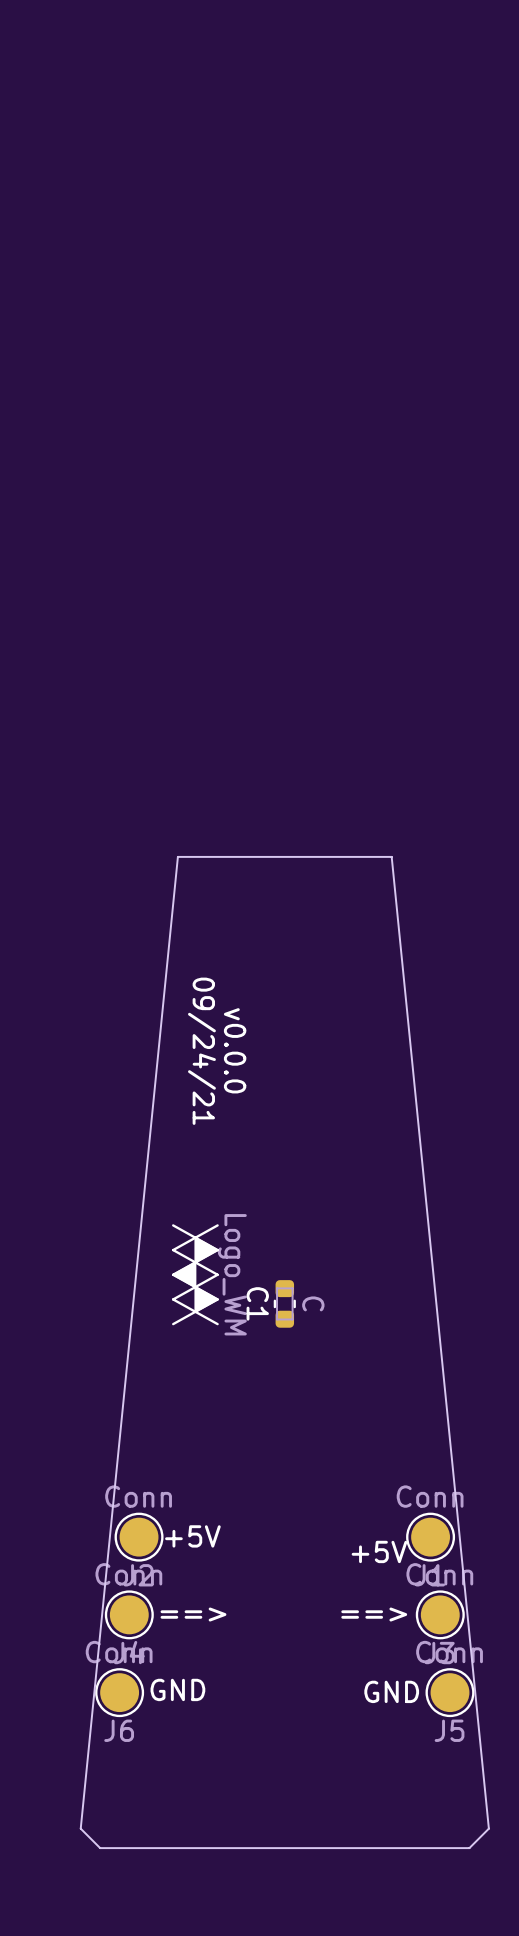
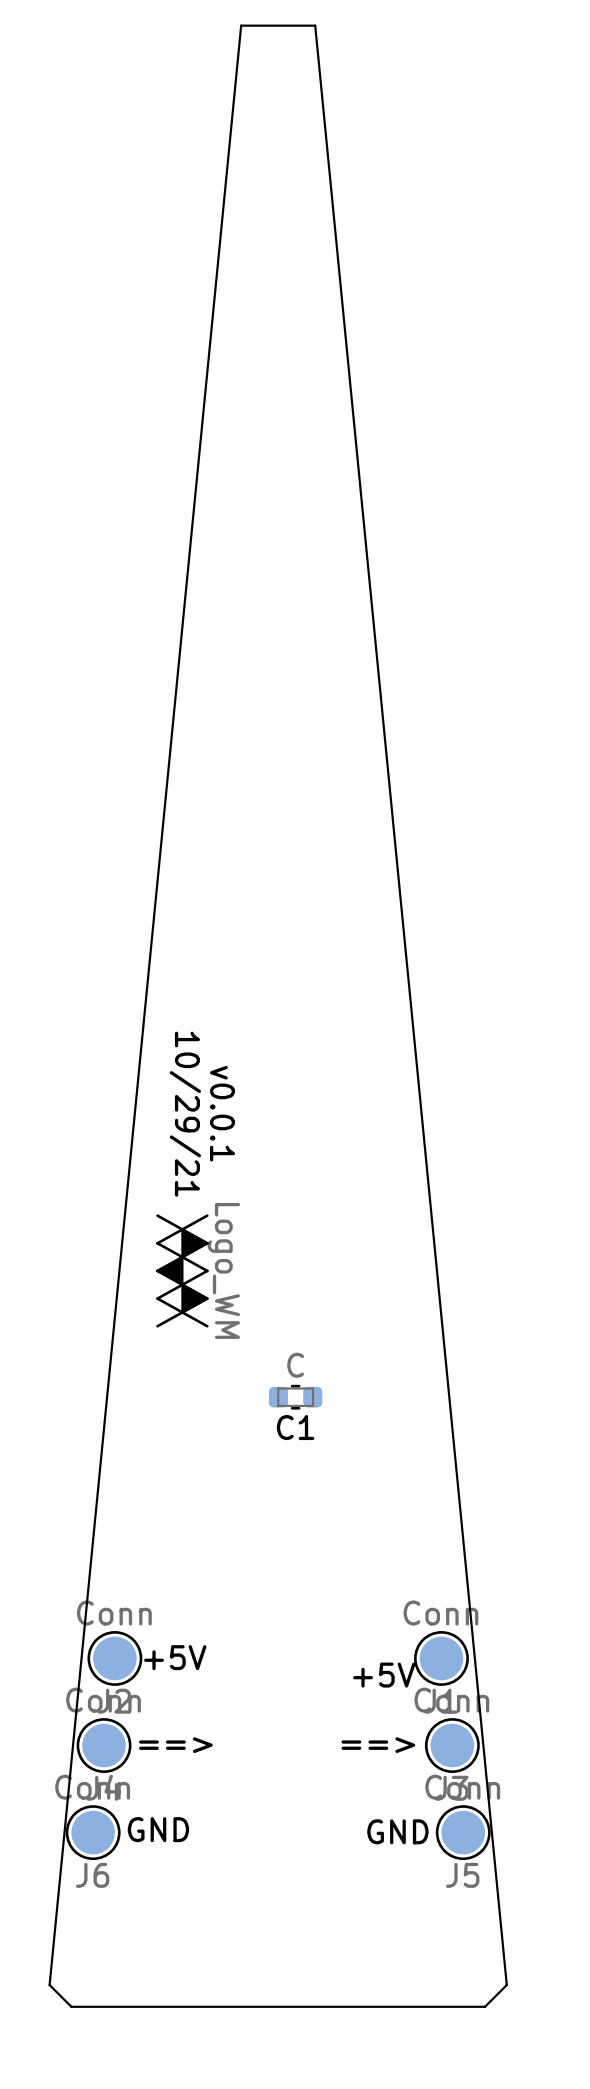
text: v0.0.0 (235, 1050) -> v0.0.1 (222, 1113)
text: 09/24/21 (201, 1051) -> 10/29/21 (185, 1114)
drawing position: (195, 1274) -> (182, 1270)
C1 name position: C1 (257, 1303) -> C1 (295, 1427)
C1 rotation: 0° (284, 1303) -> 90° clockwise (295, 1397)
C1 value position: C (313, 1303) -> C (295, 1365)
board edge: (488, 1828) (391, 856) (177, 856) (80, 1828) -> (506, 1985) (315, 25) (241, 25) (49, 1985)

